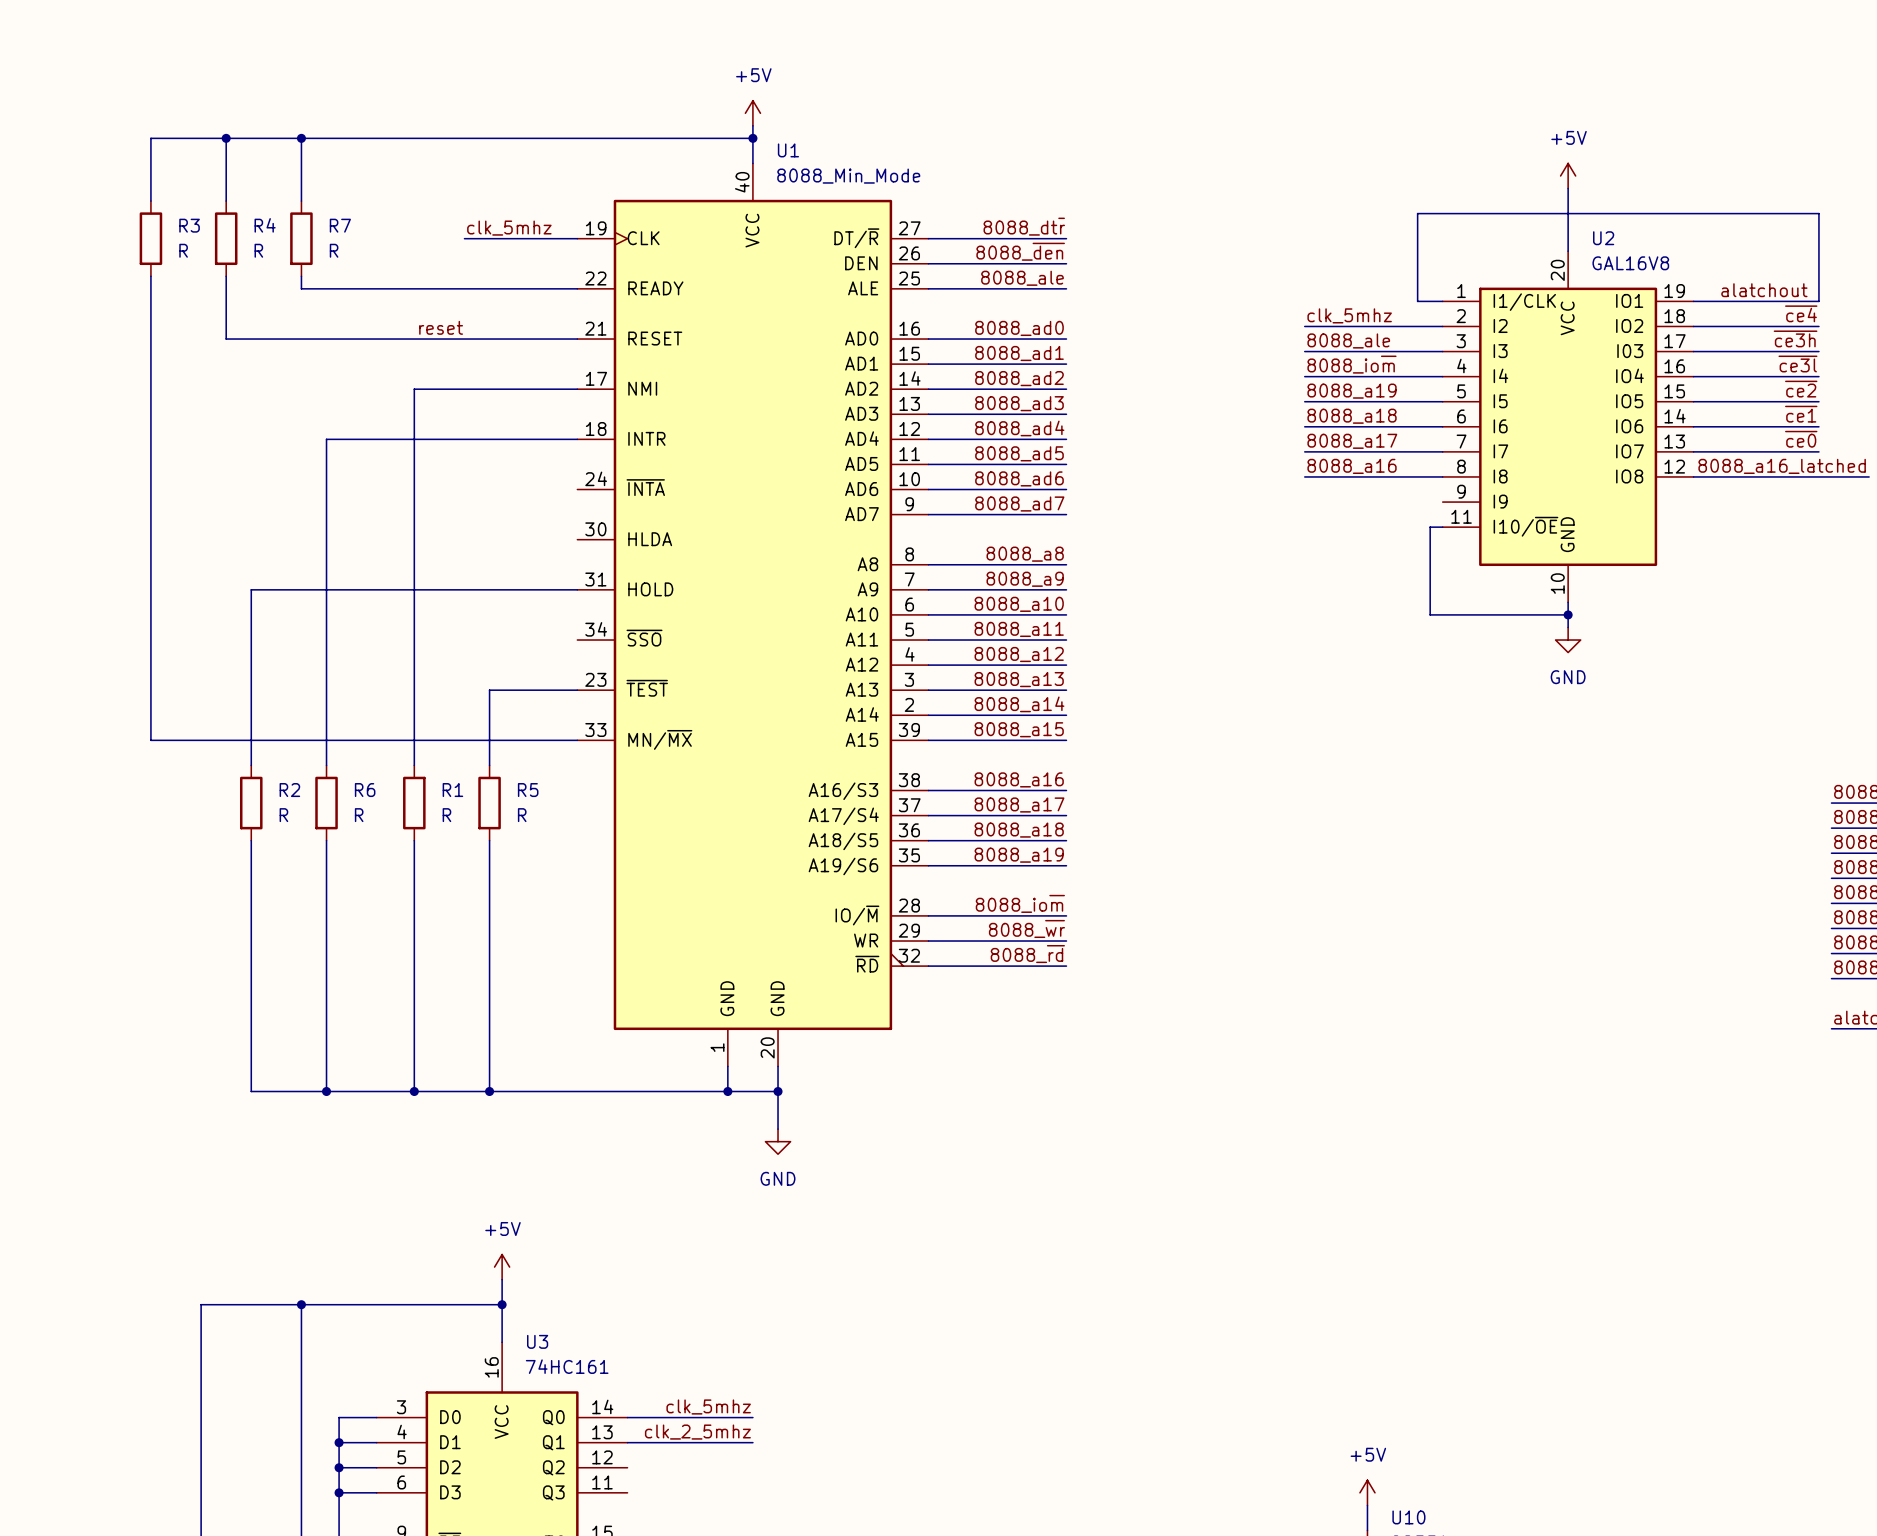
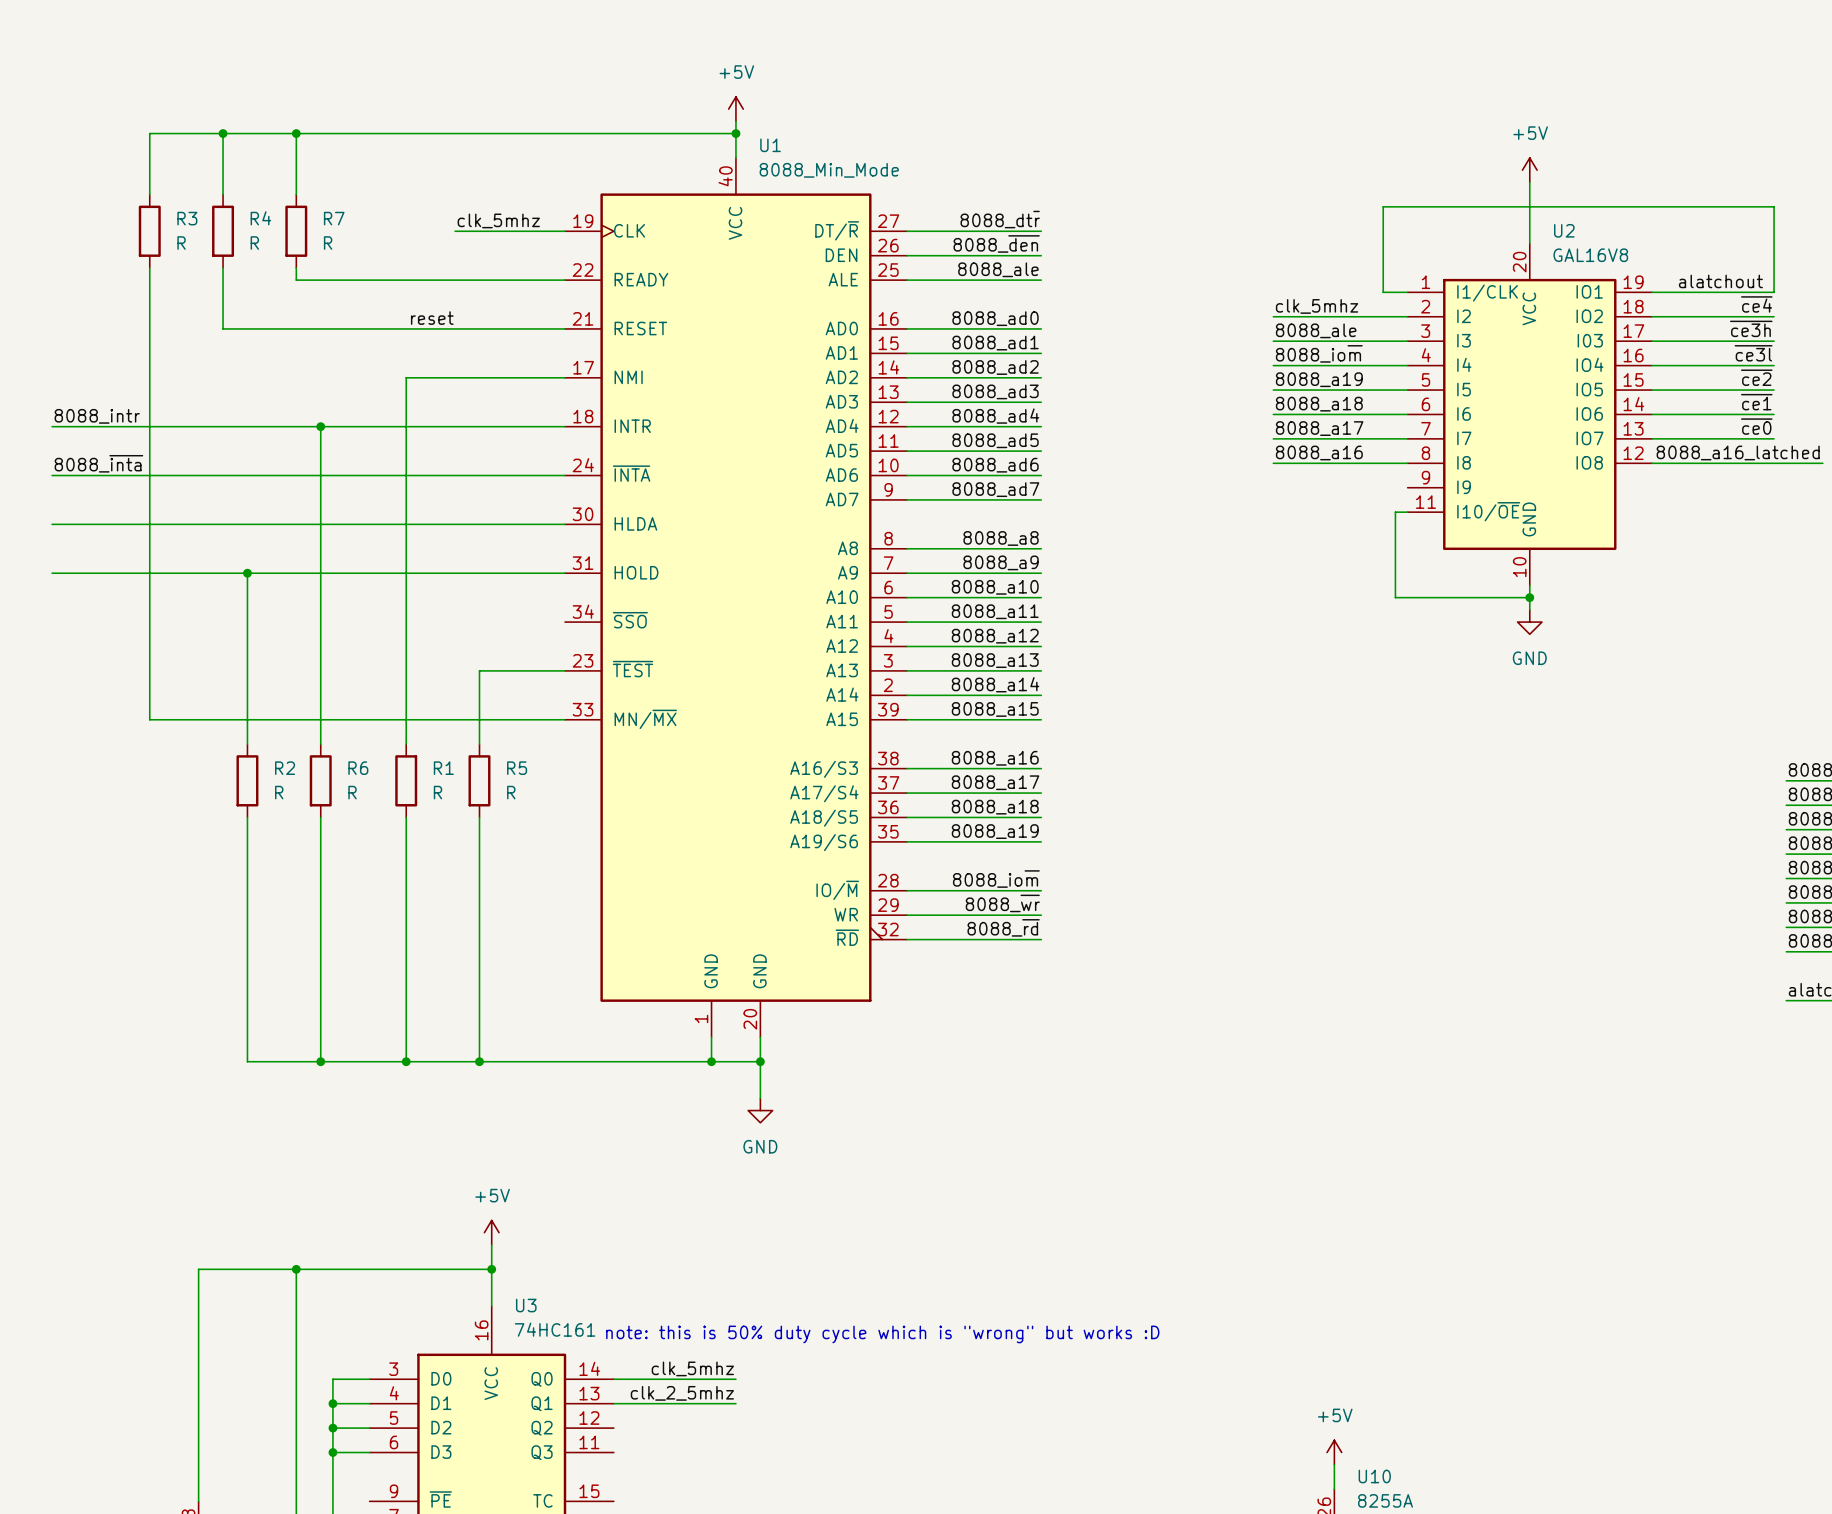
label: none -> 8088_intr (97, 416)
wire: none -> (52, 426) (320, 426)
junction: none -> (320, 426)
label: none -> 8088_~{inta} (98, 463)
wire: none -> (52, 475) (564, 475)
wire: none -> (52, 524) (564, 524)
wire: none -> (52, 573) (247, 573)
junction: none -> (247, 573)
text: none -> note: this is 50% duty cycle which is "wrong" but works :D (882, 1334)

